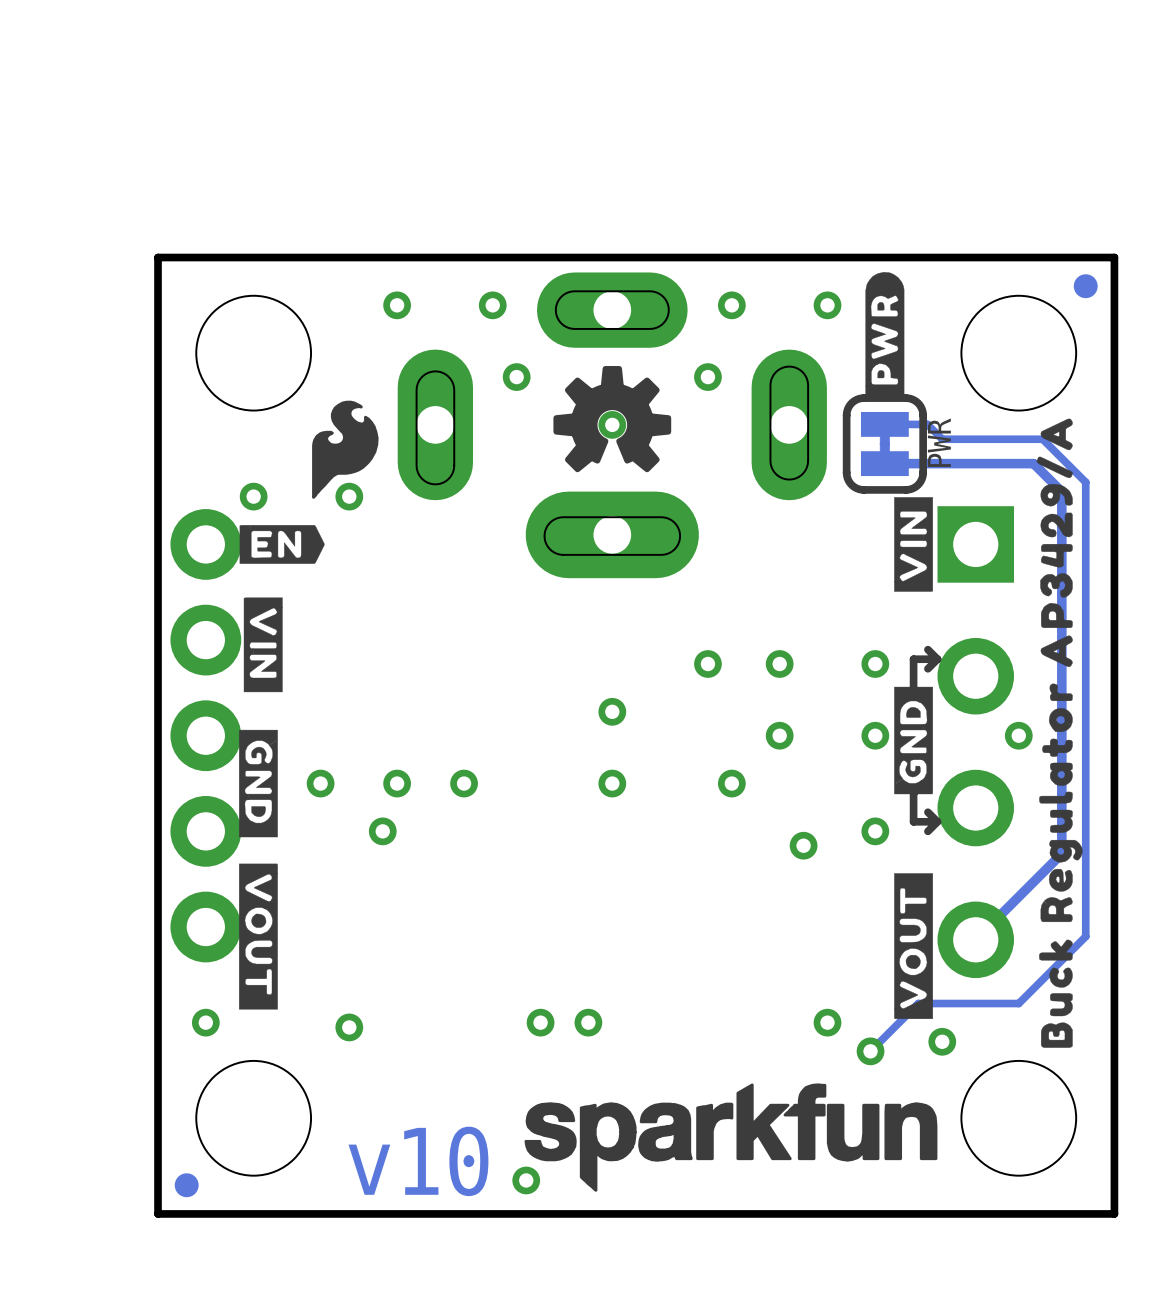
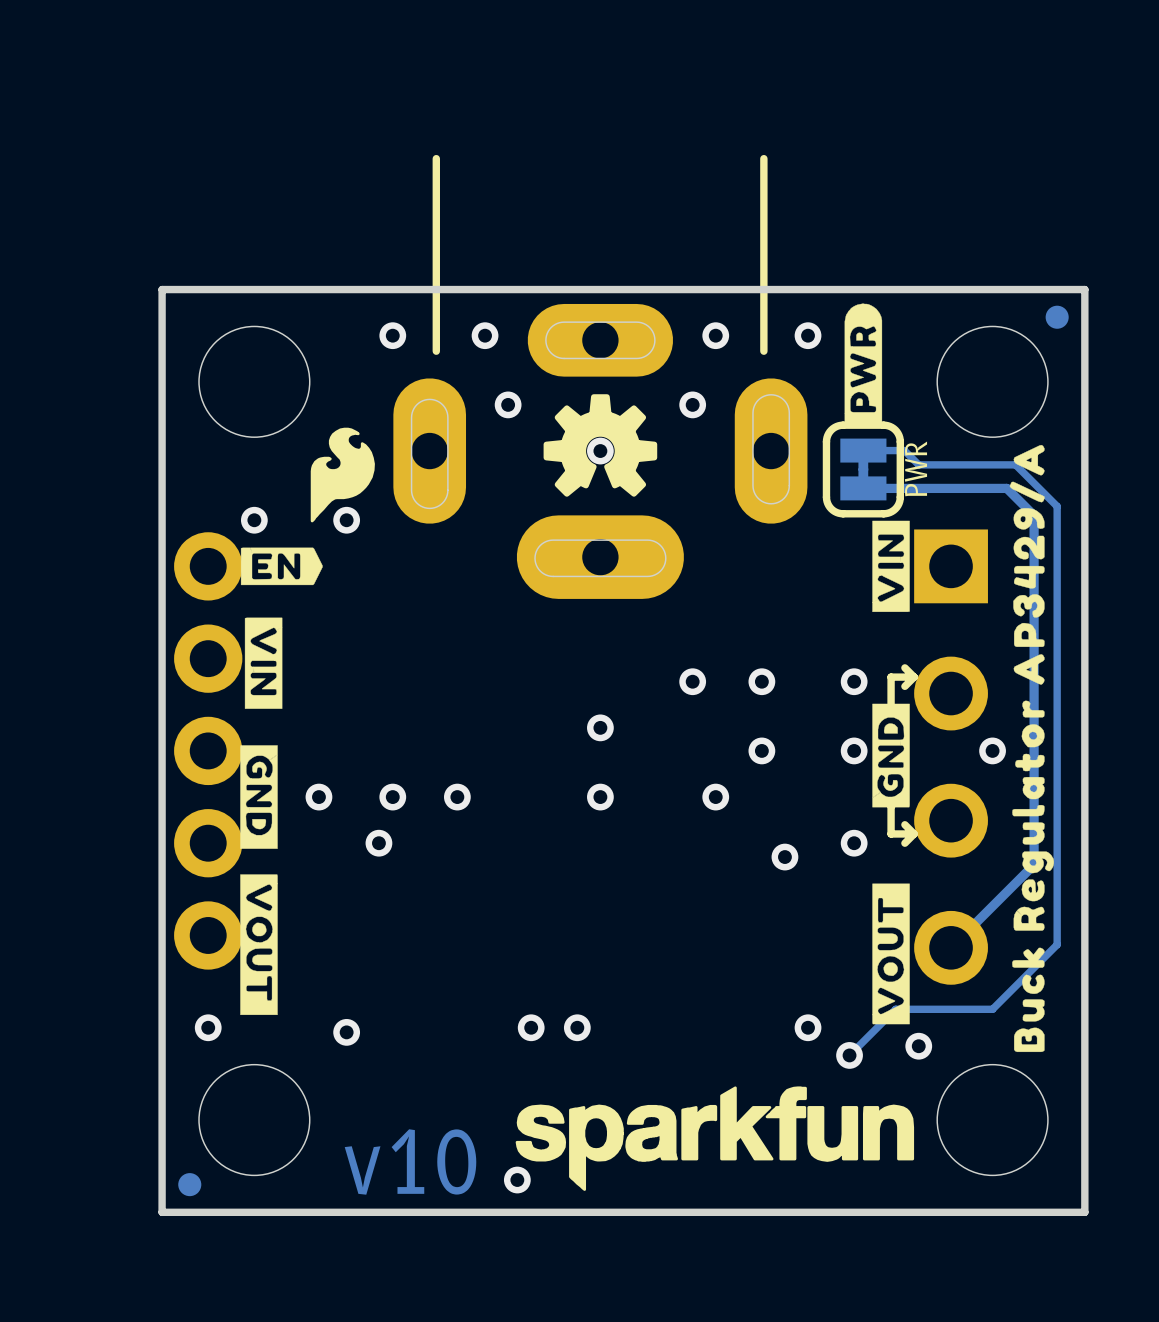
part: none -> (600, 376)

